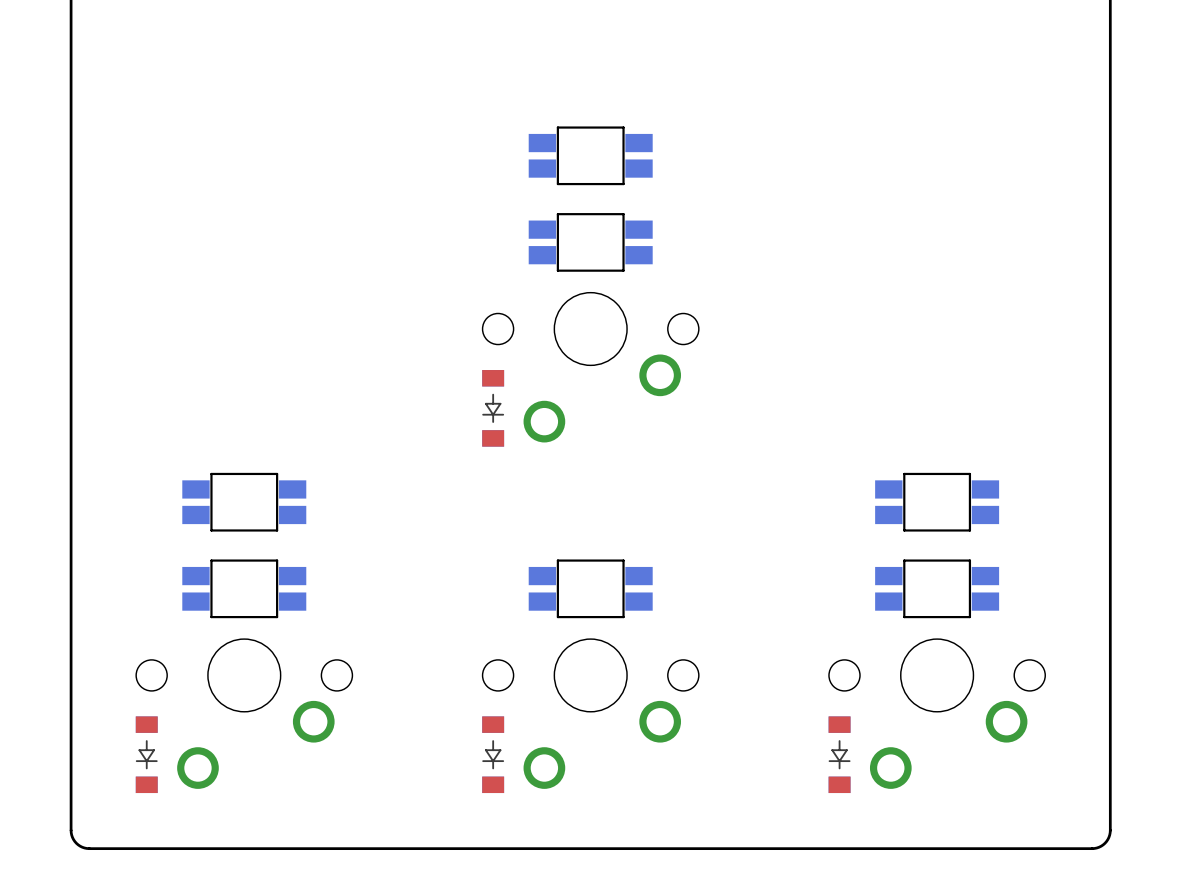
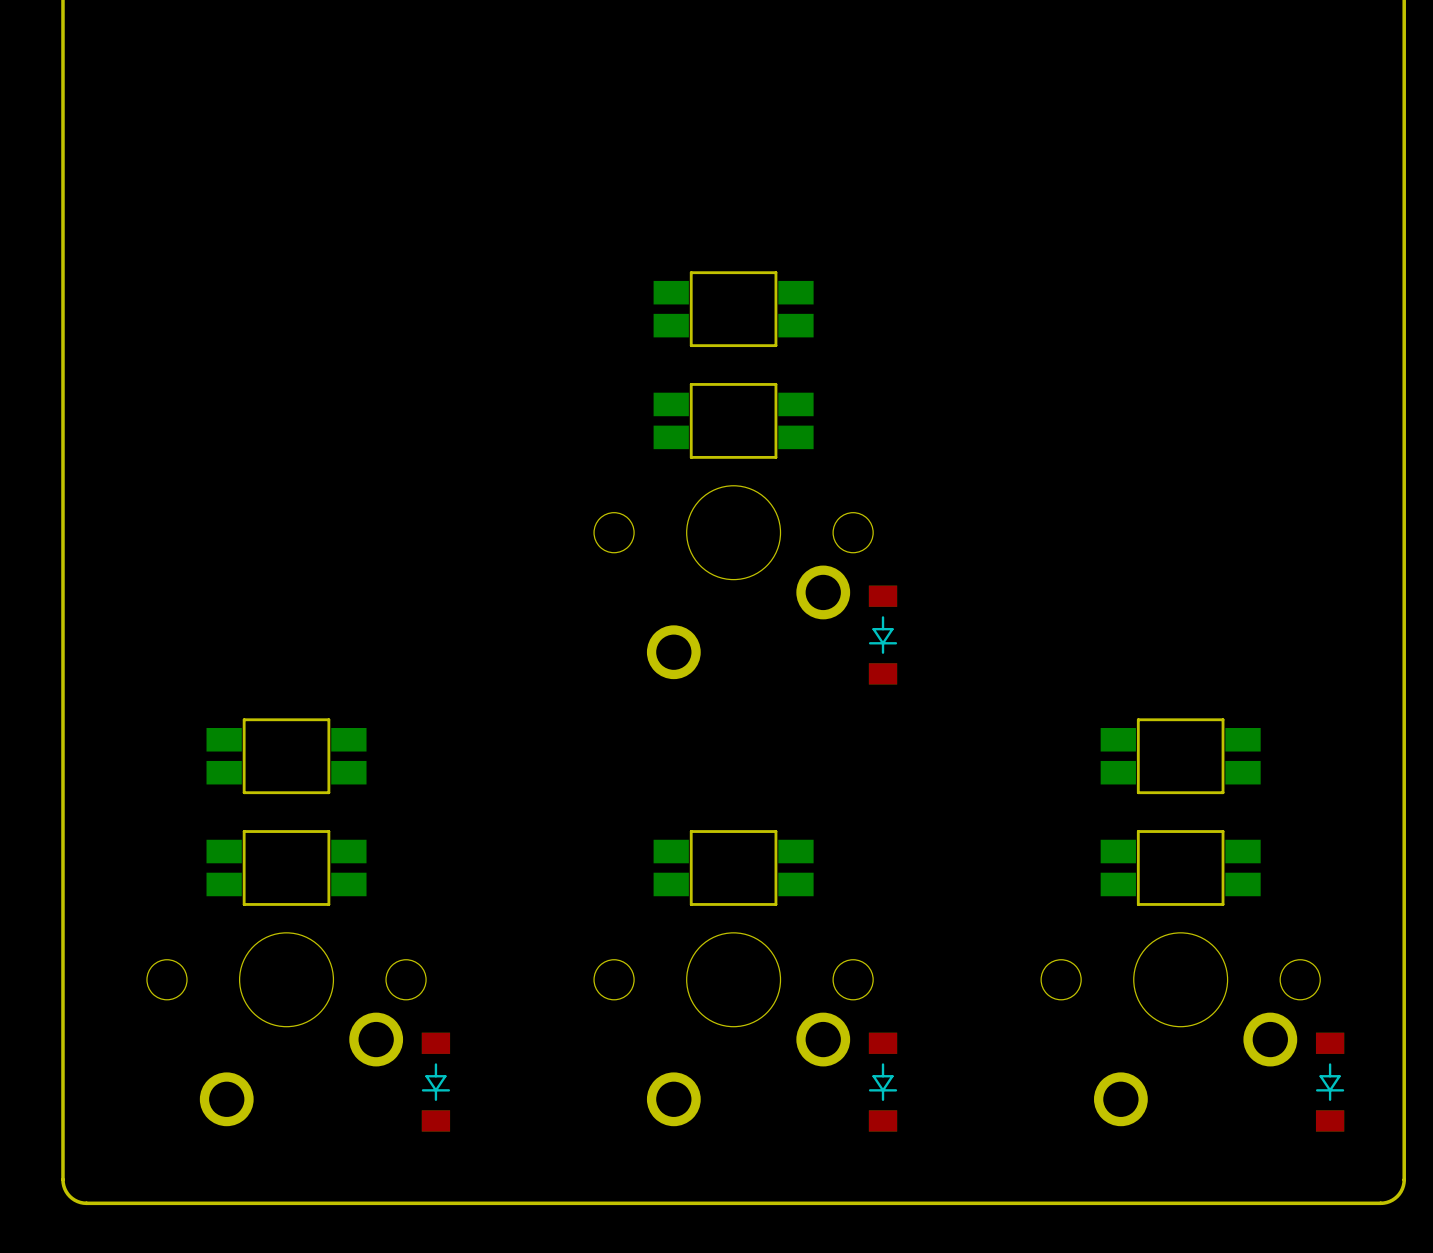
part: (493, 408) -> none
part: none -> (883, 635)
part: (146, 754) -> none
part: none -> (435, 1082)
part: (493, 754) -> none
part: none -> (883, 1082)
part: (839, 754) -> none
part: none -> (1330, 1082)

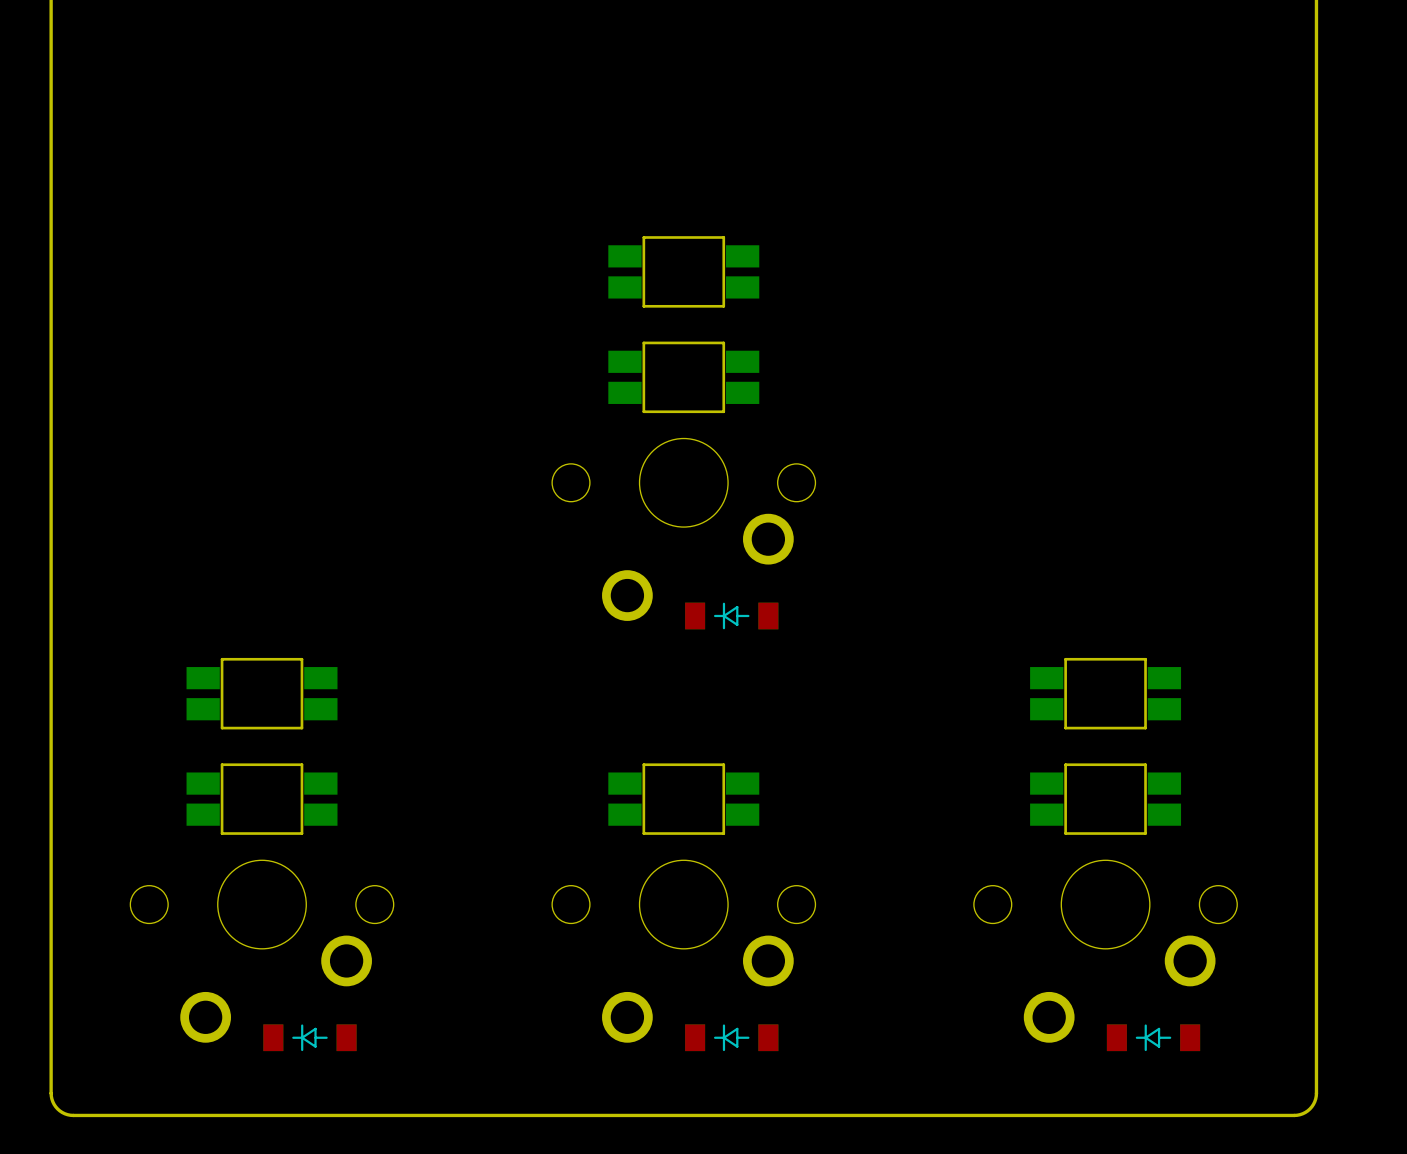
part rotation: 0° (883, 635) -> 90° clockwise (731, 615)
part position: (883, 635) -> (731, 615)
part rotation: 0° (435, 1082) -> 90° clockwise (309, 1037)
part position: (435, 1082) -> (309, 1037)
part rotation: 0° (883, 1082) -> 90° clockwise (731, 1037)
part position: (883, 1082) -> (731, 1037)
part rotation: 0° (1330, 1082) -> 90° clockwise (1153, 1037)
part position: (1330, 1082) -> (1153, 1037)

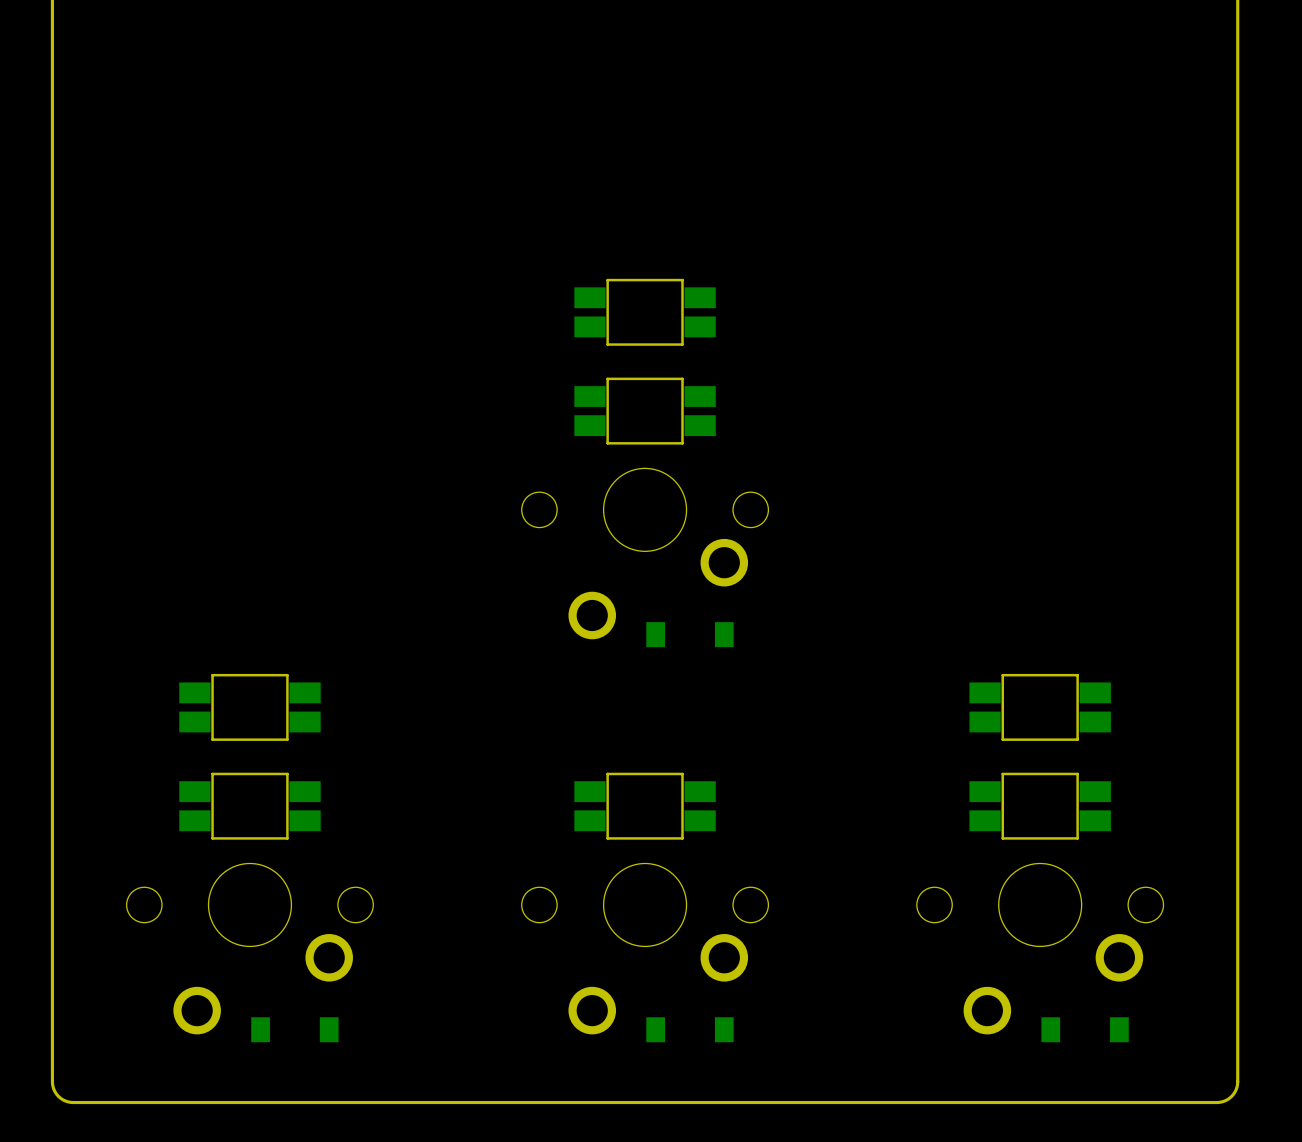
part side: top (731, 615) -> bottom (689, 634)
part side: top (309, 1037) -> bottom (294, 1029)
part side: top (731, 1037) -> bottom (689, 1029)
part side: top (1153, 1037) -> bottom (1085, 1029)

